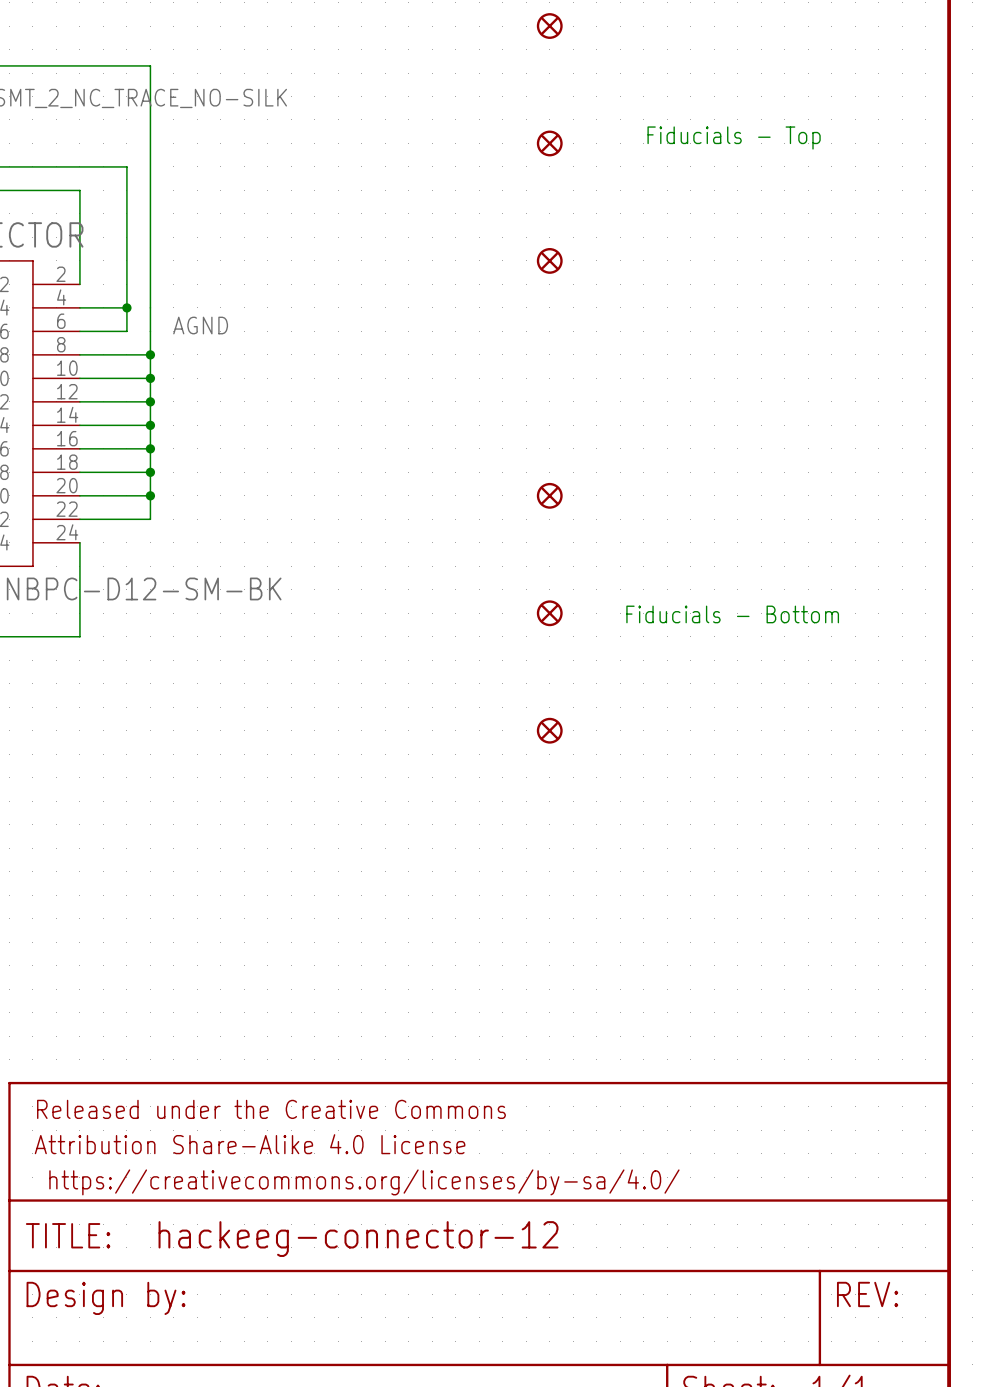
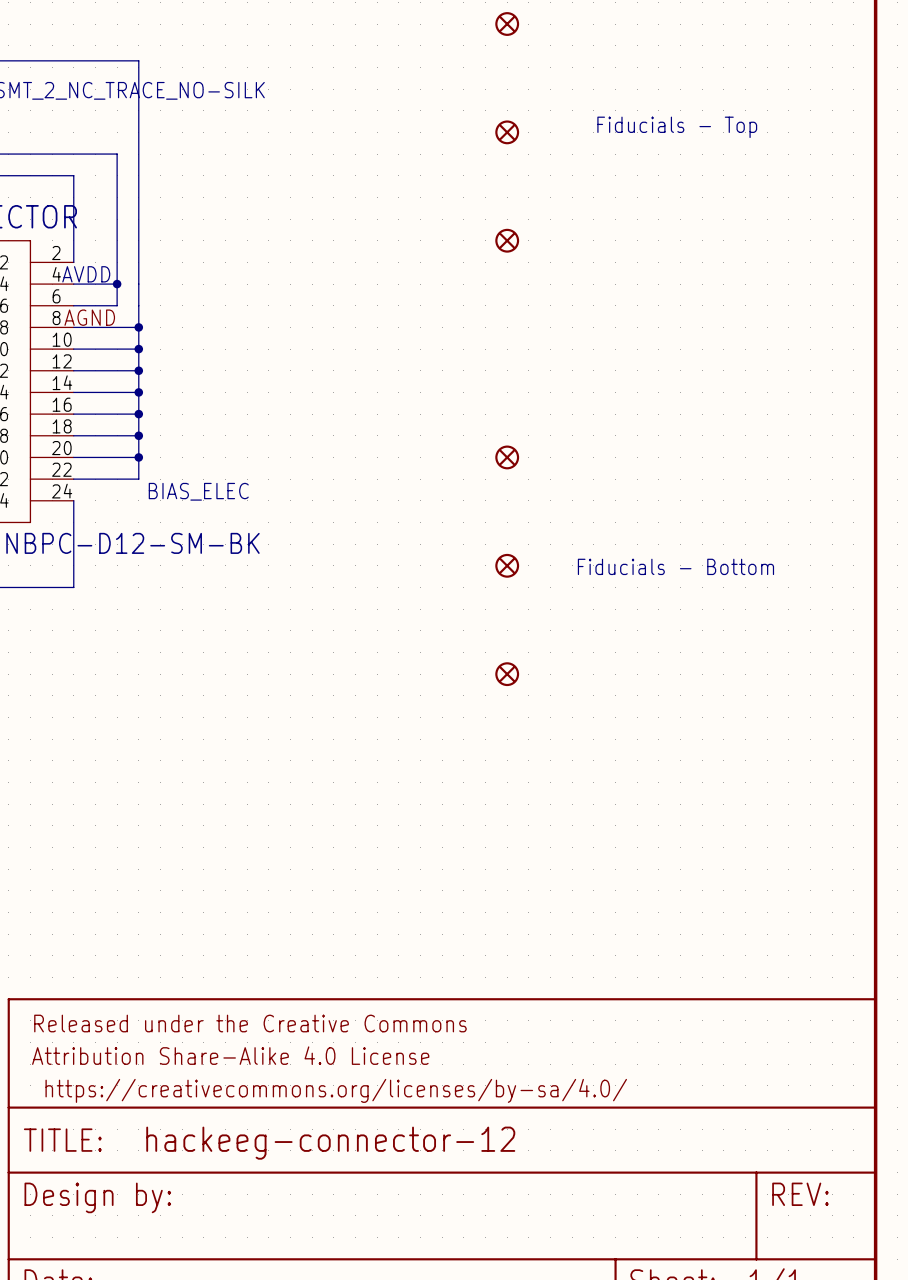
text: none -> AVDD (86, 274)
label position: AGND (200, 325) -> AGND (89, 317)
text: none -> BIAS_ELEC (198, 491)

